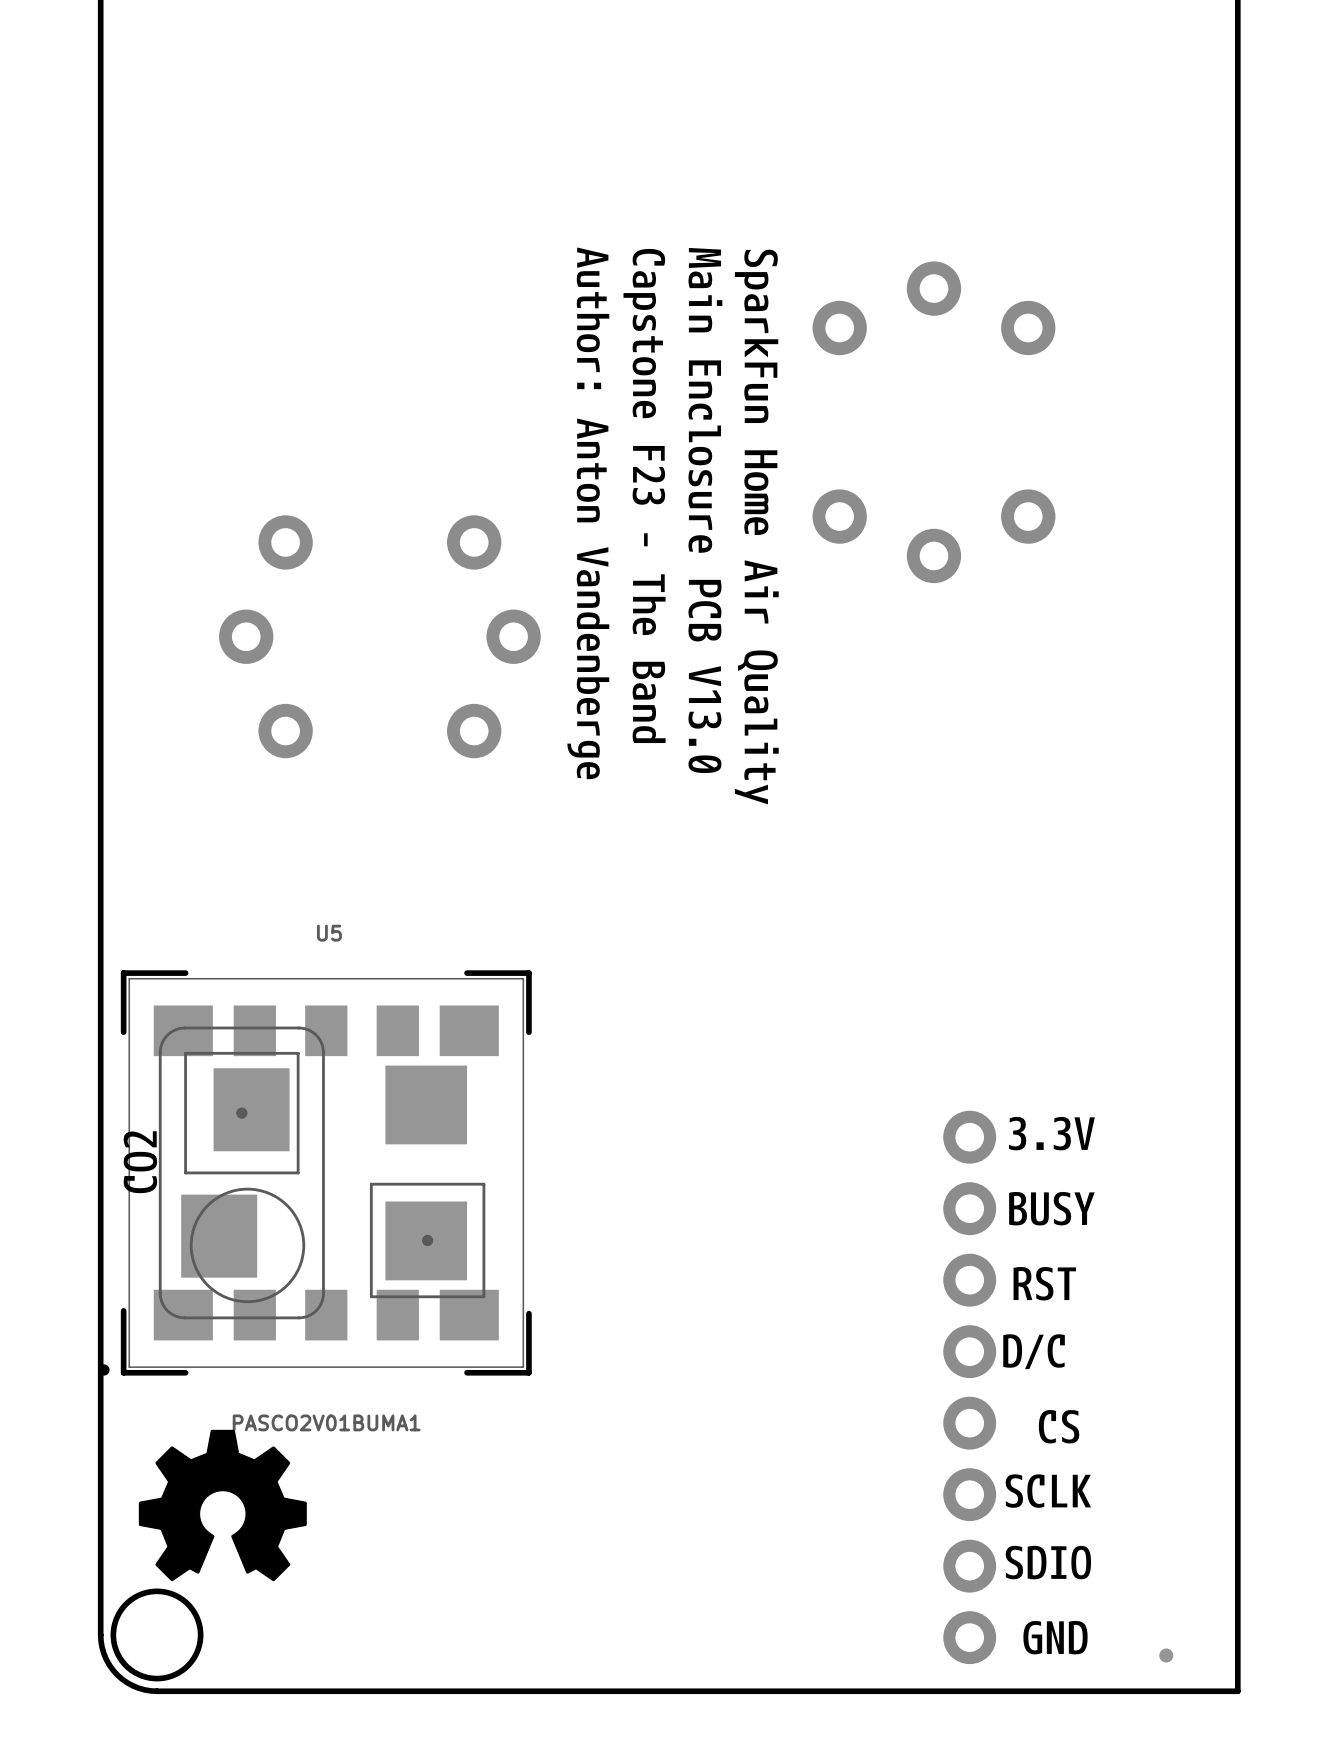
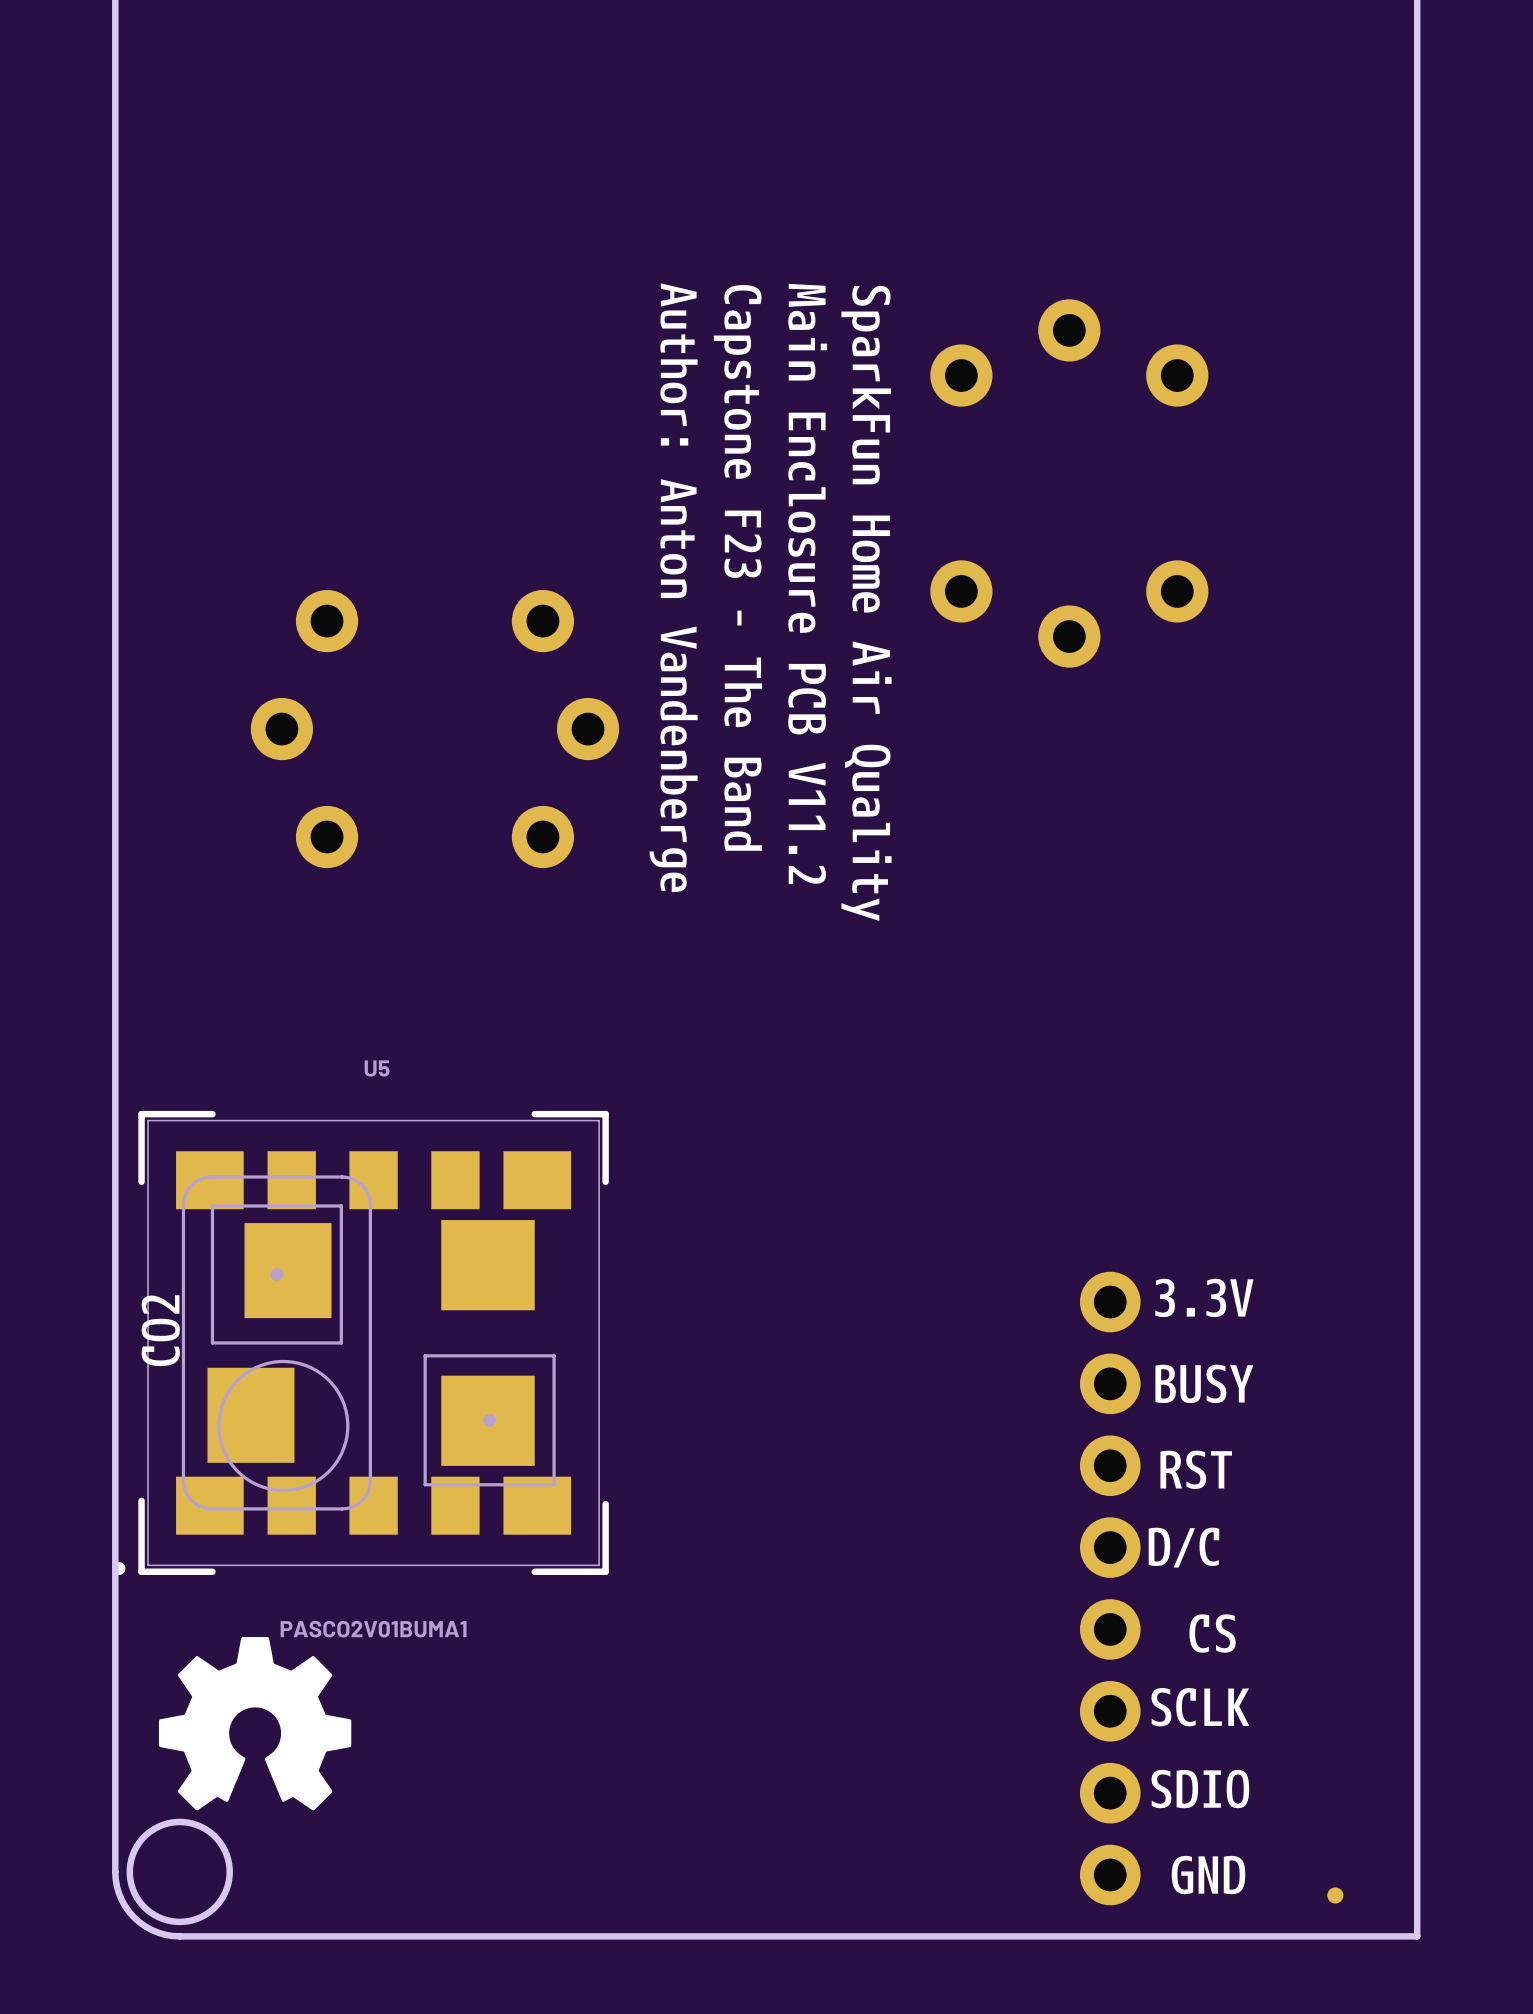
drawing shape: [567, 247, 779, 805] -> [649, 283, 892, 921]

